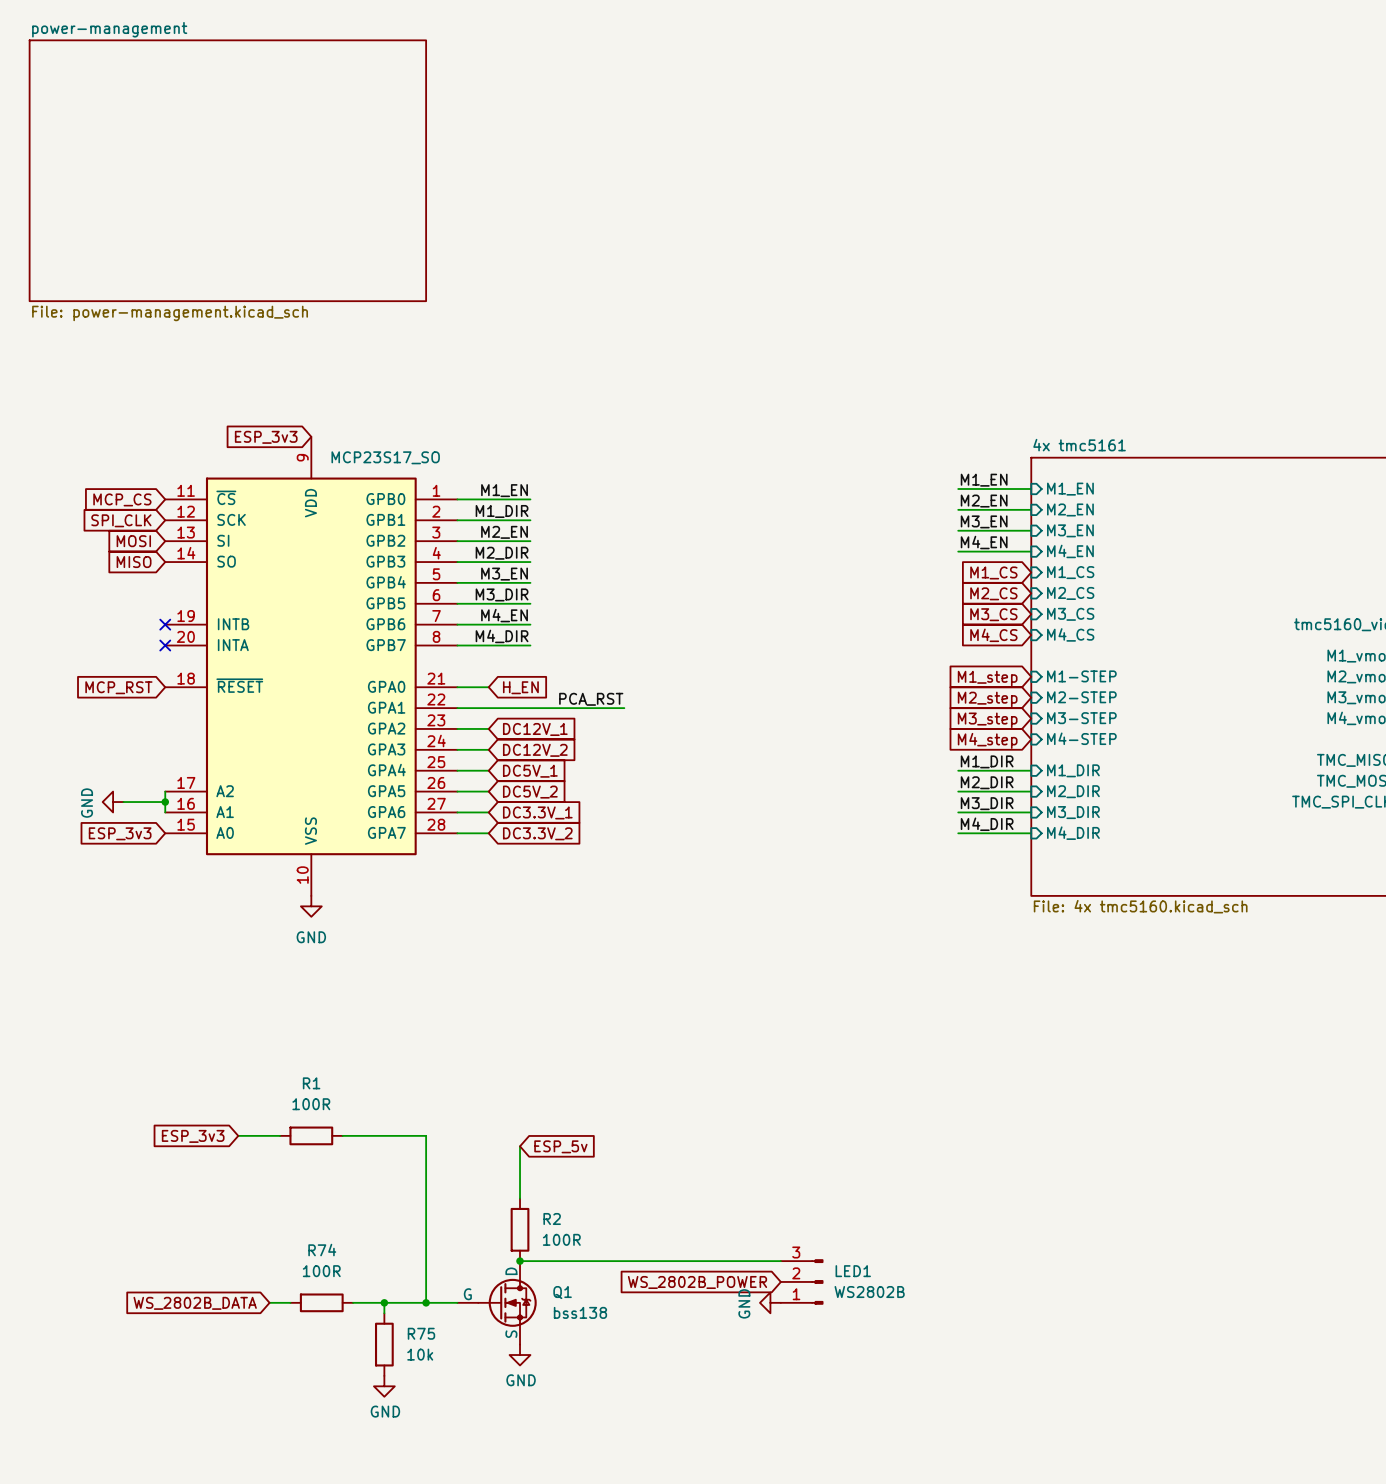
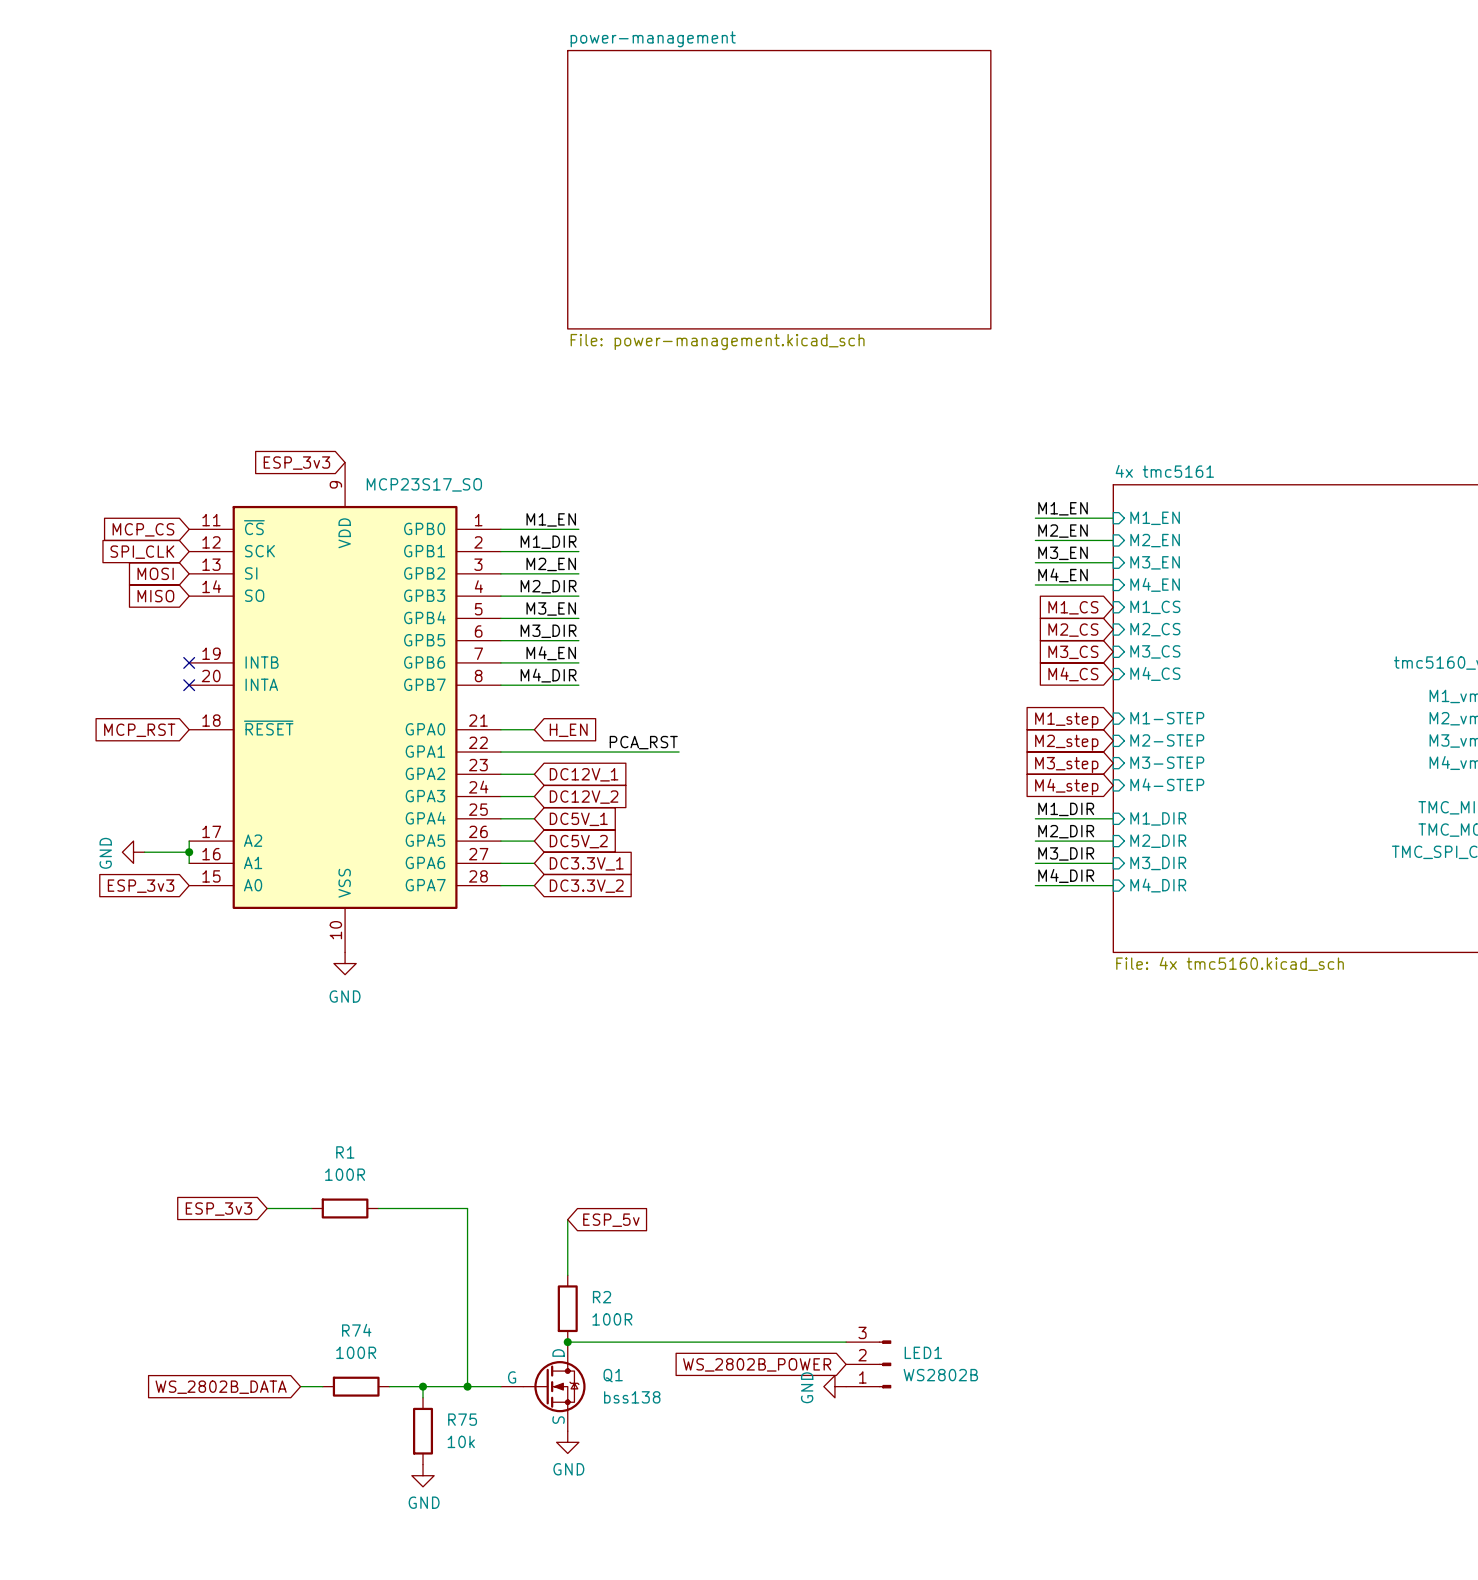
sheet power-management: File: power-management.kicad_sch (227, 170) -> none
sheet power-management: none -> File: power-management.kicad_sch (779, 189)

